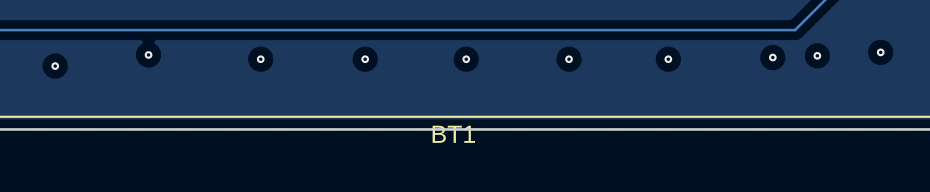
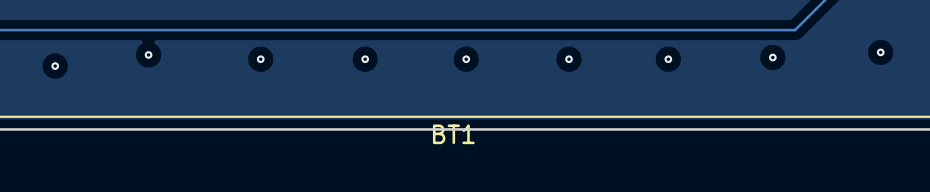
via: (817, 55) -> none

